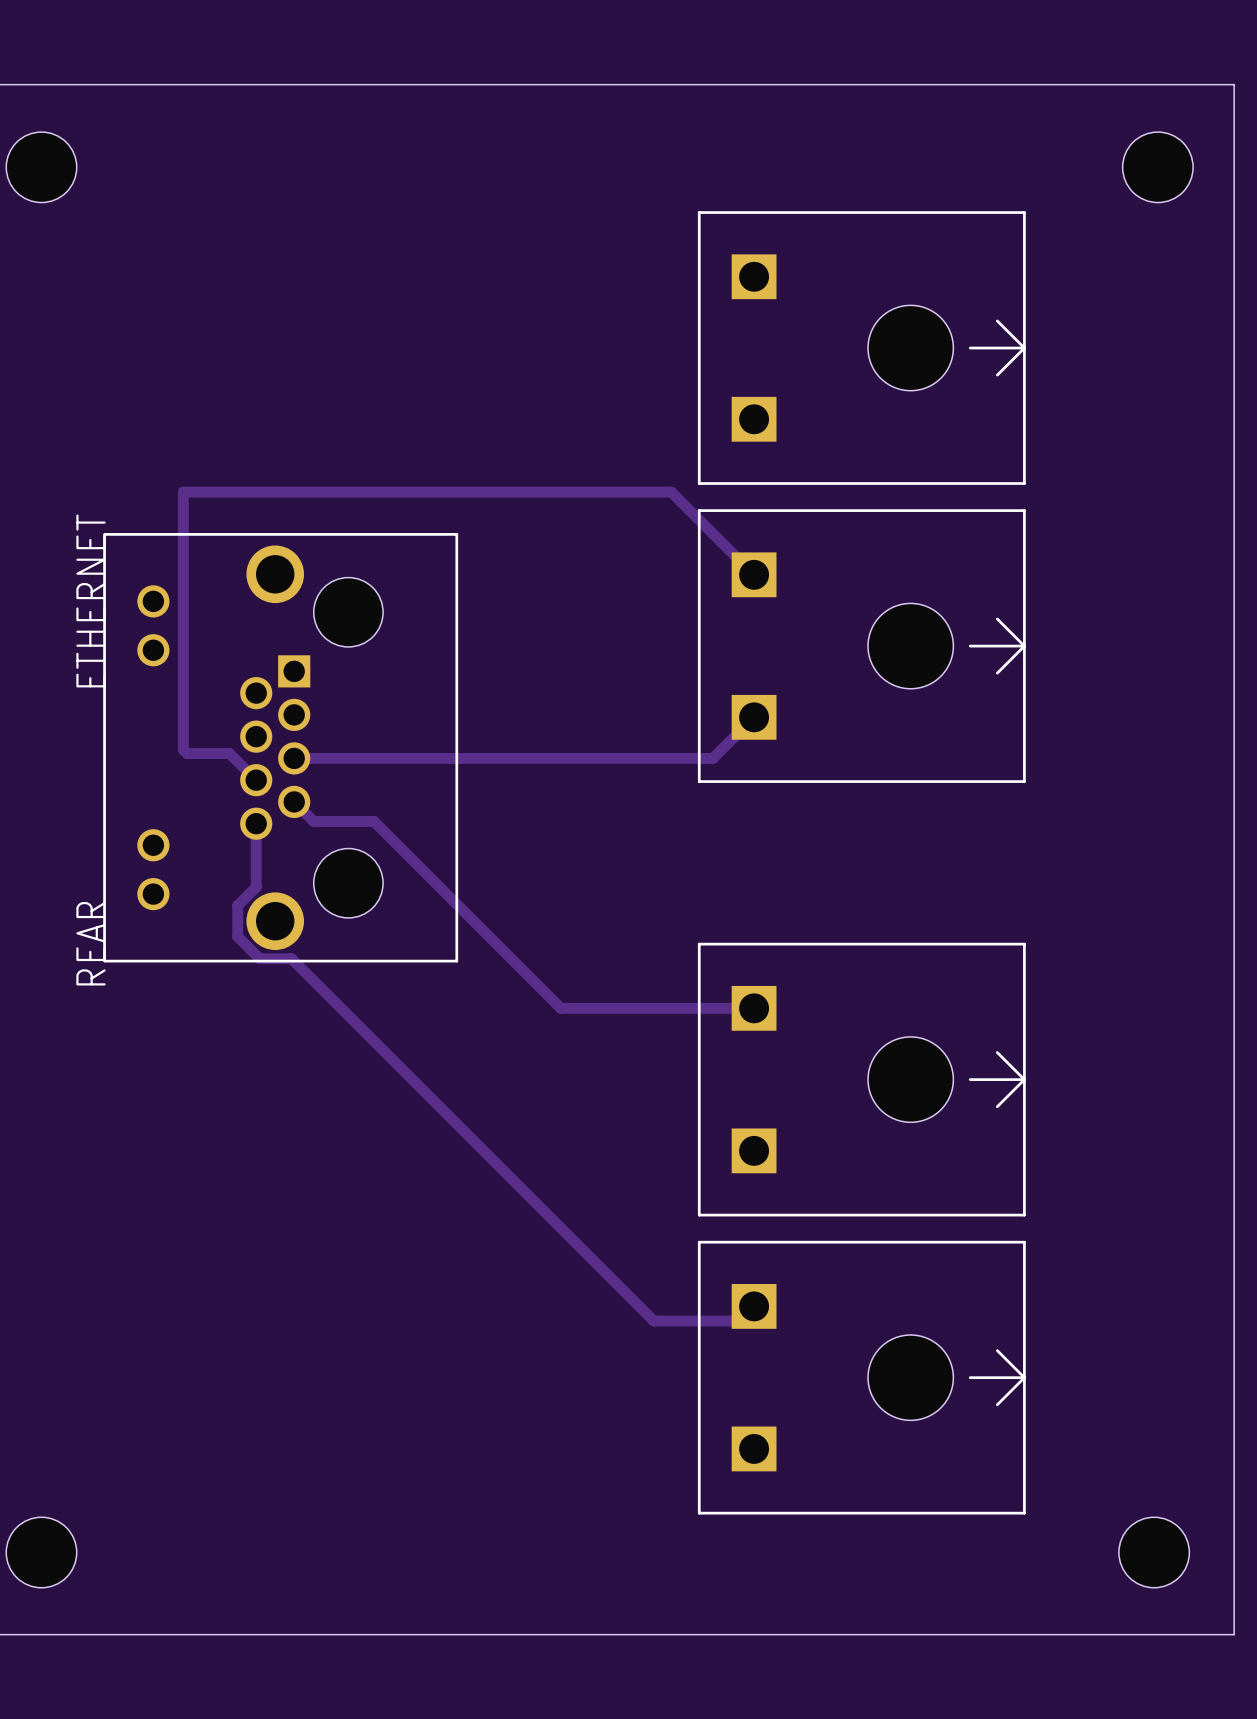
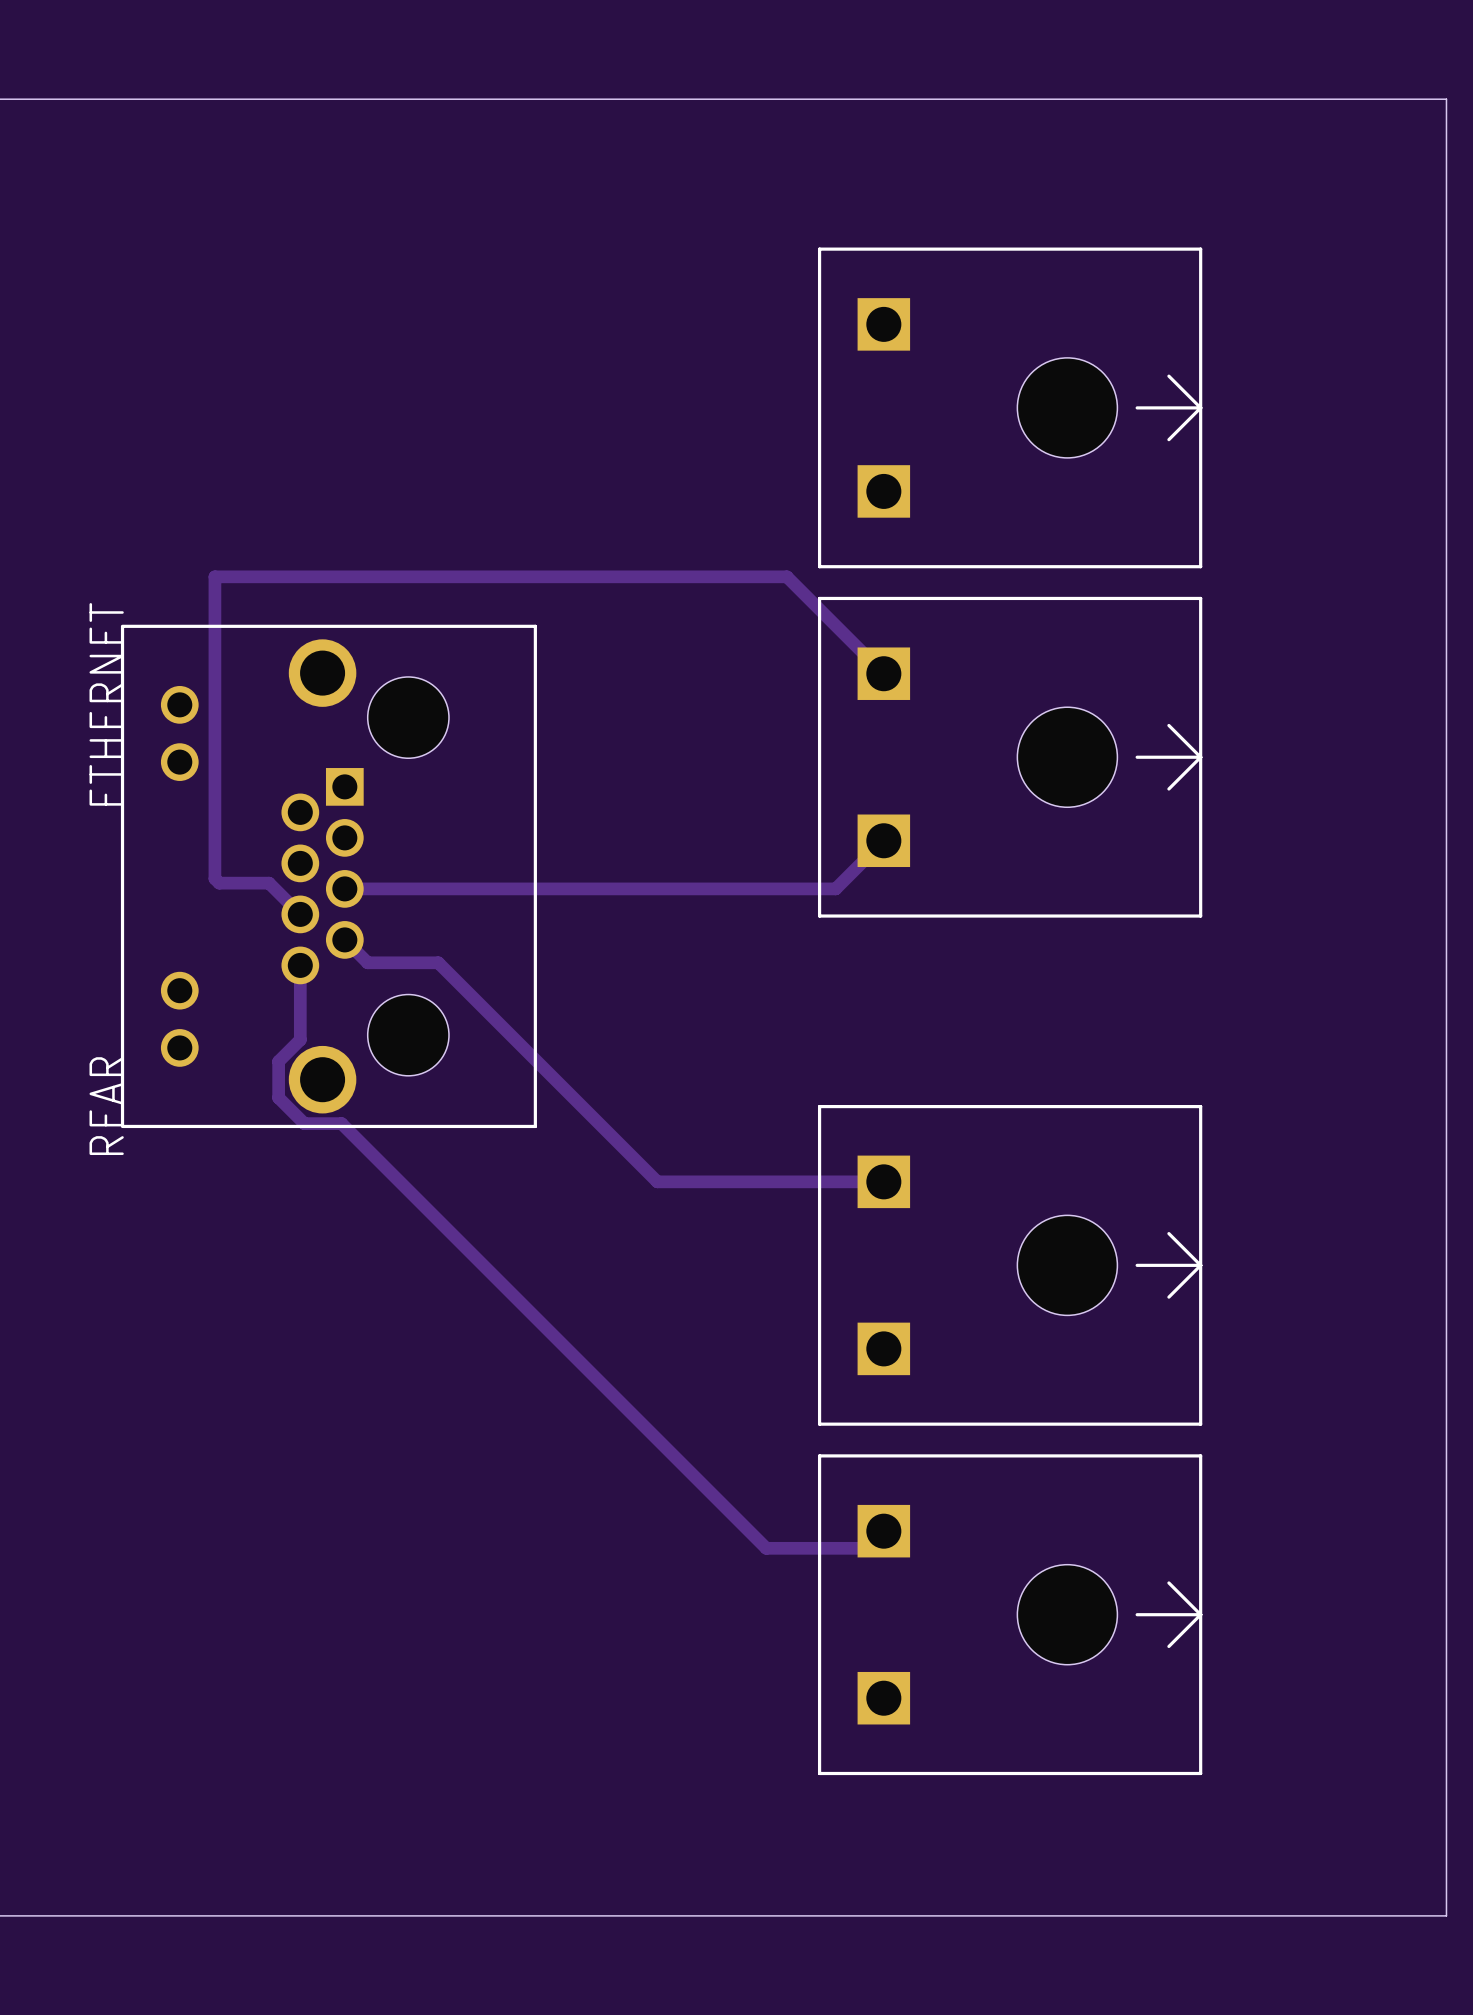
part: (41, 167) -> none
part: (1157, 167) -> none
part: (41, 1552) -> none
part: (1154, 1552) -> none

